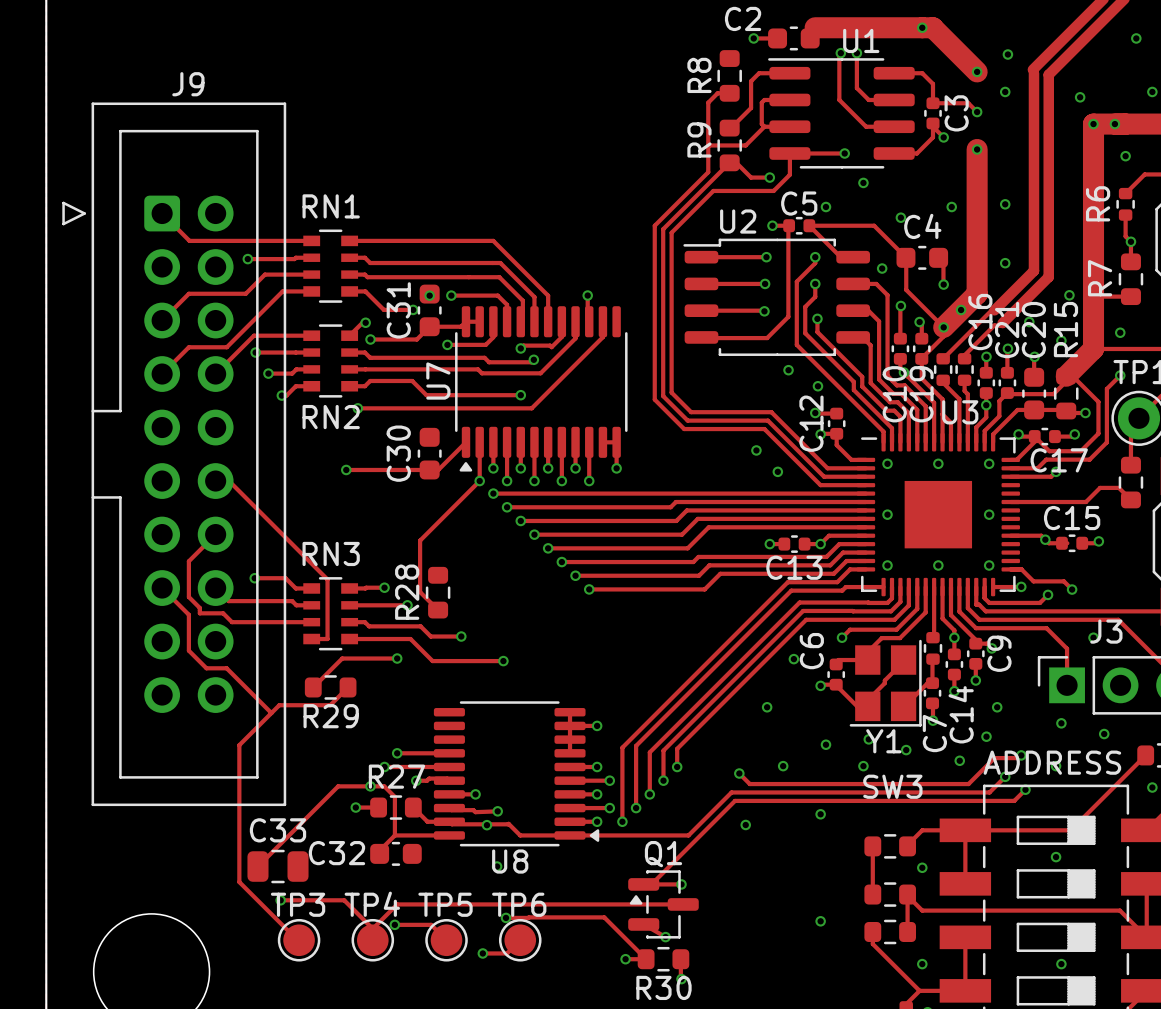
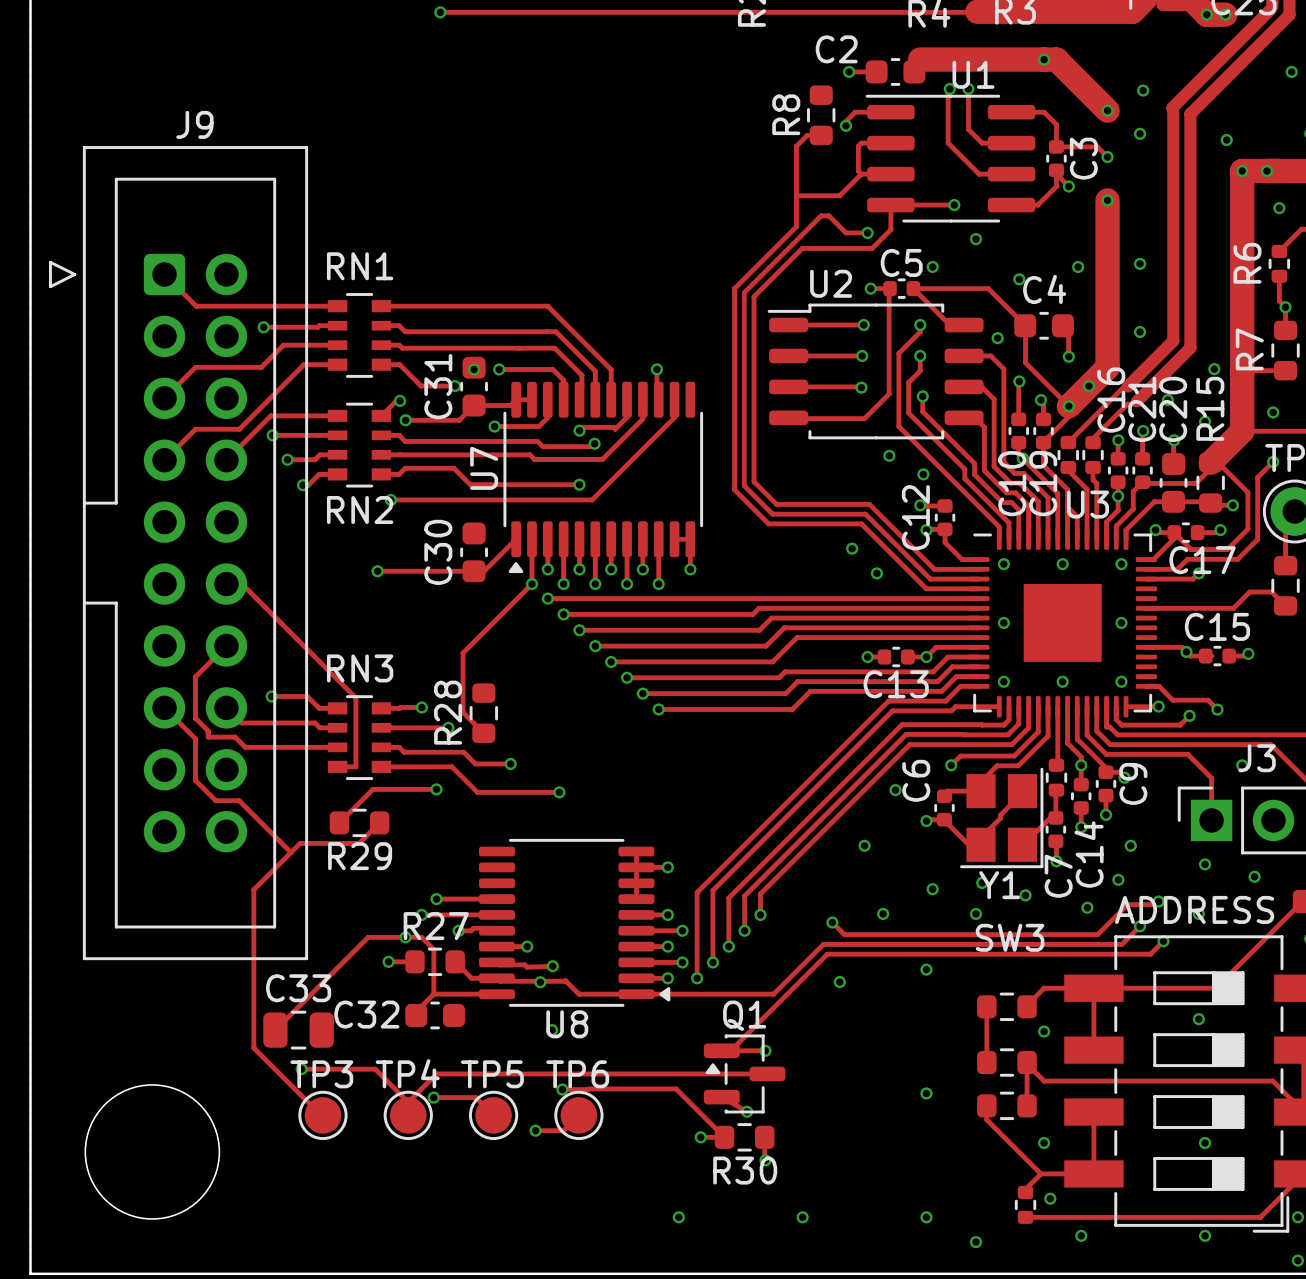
track: (751, 85) (751, 108) (729, 128) -> none
via: none -> (845, 125)
R9: (729, 145) -> none

